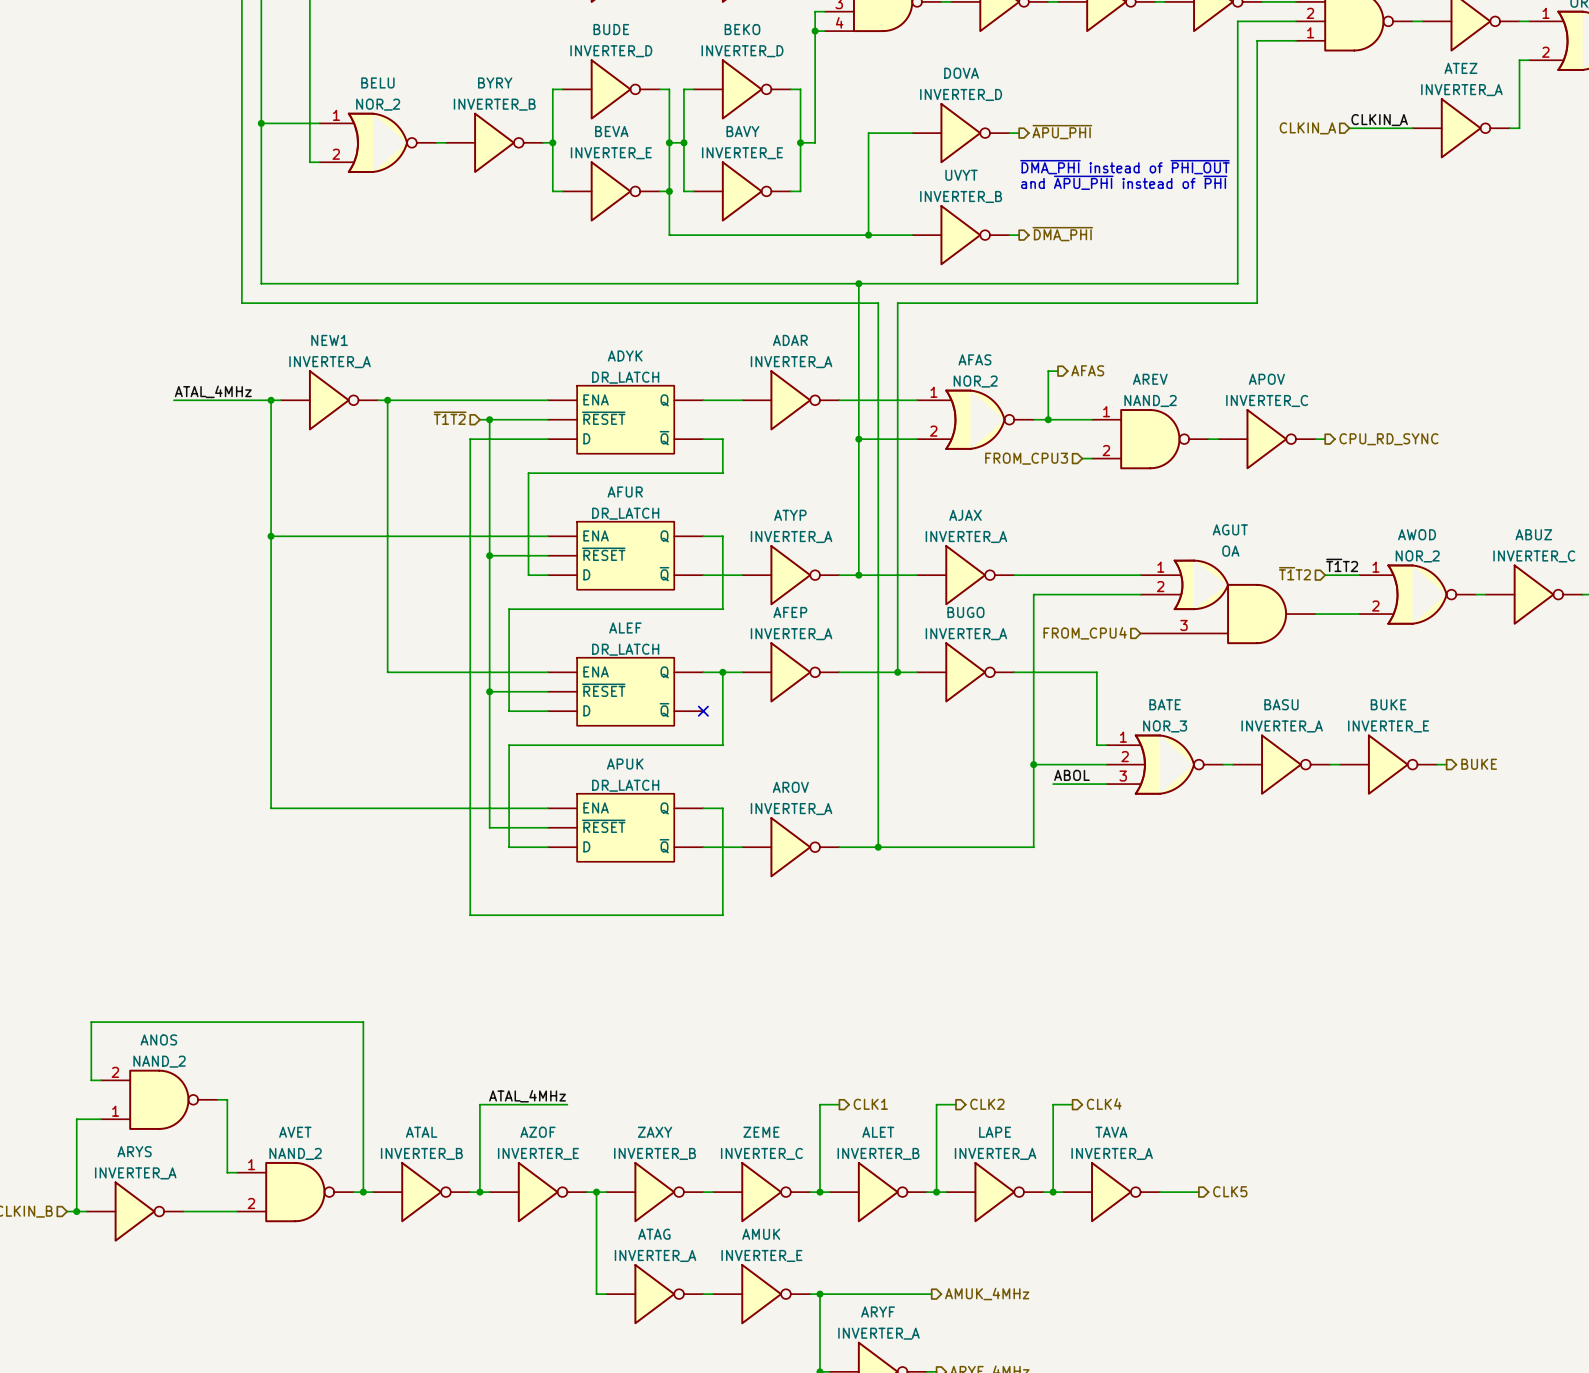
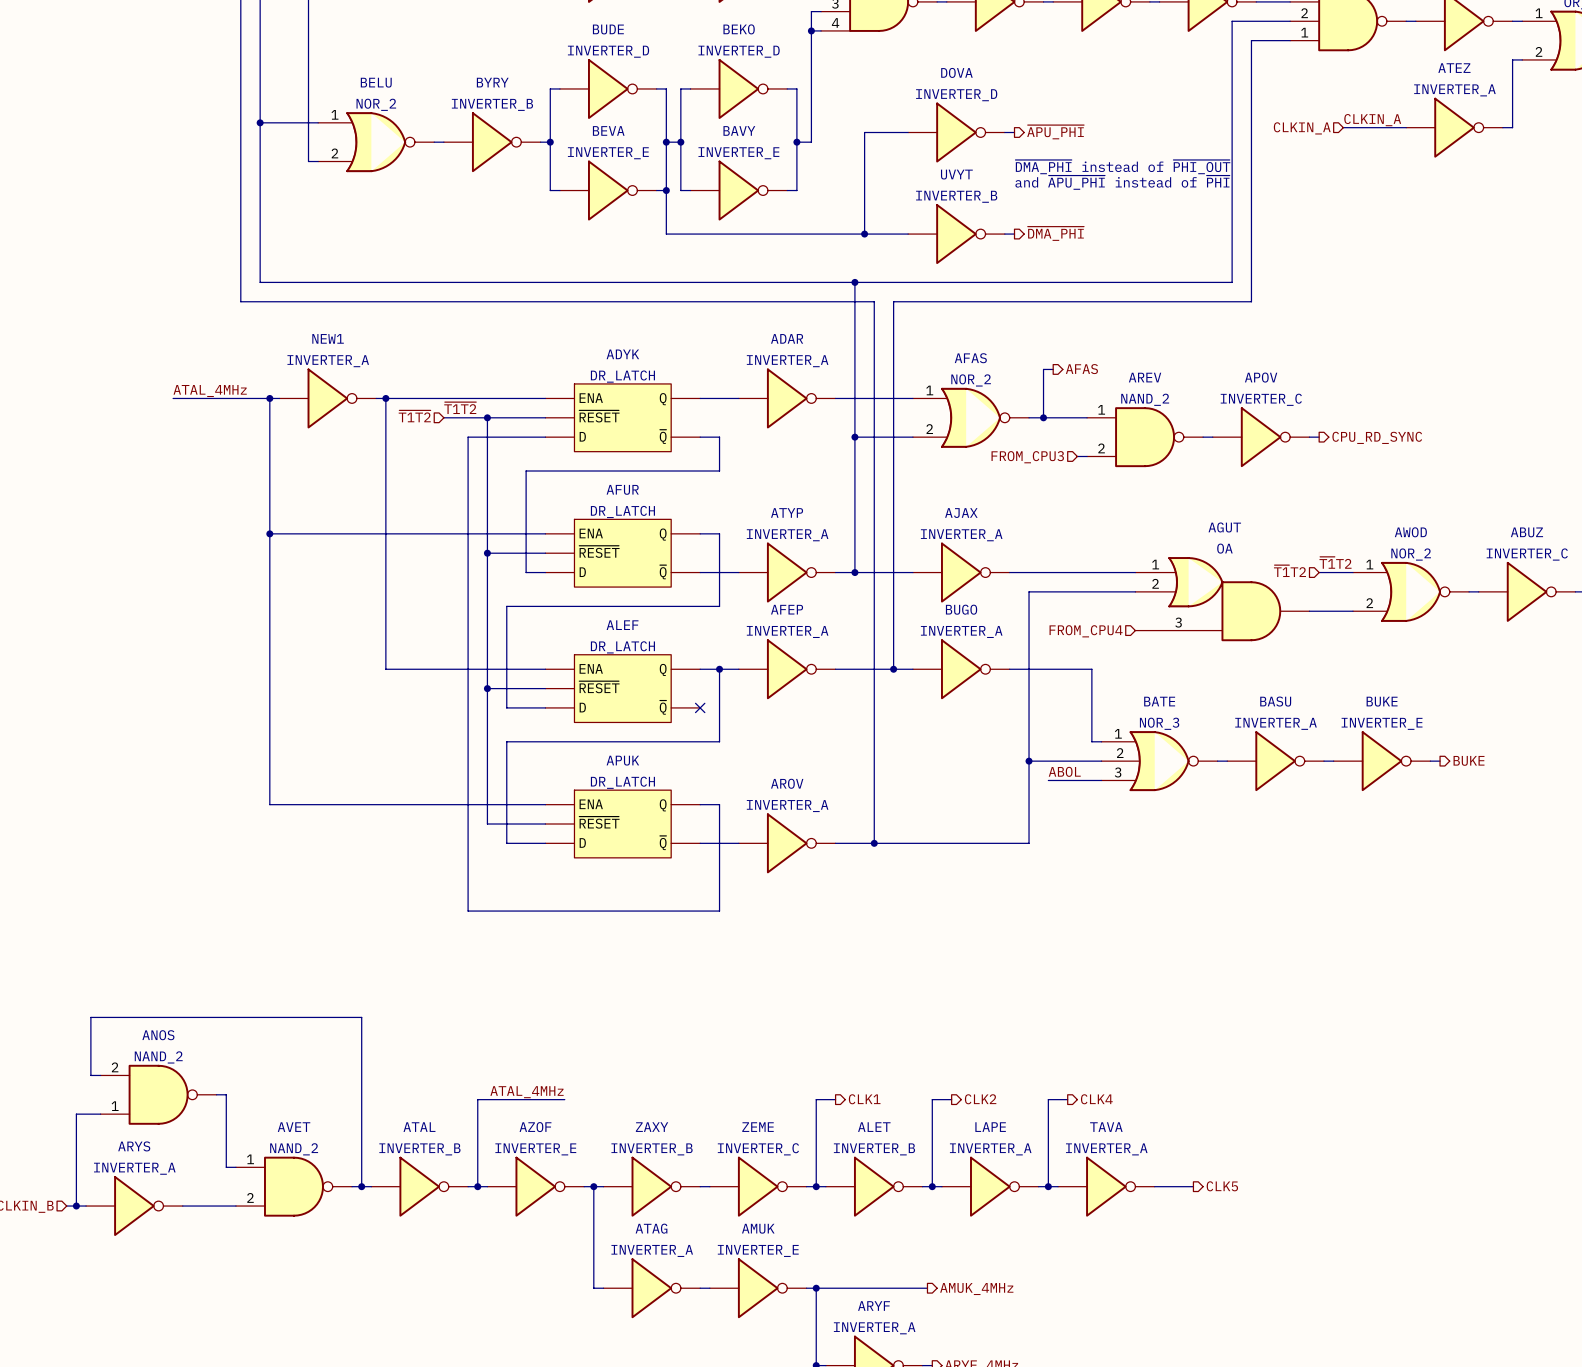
label: none -> ~{T1T2} (460, 408)
hierarchical label position: ~{T1T2} (450, 418) -> ~{T1T2} (414, 416)
wire: none -> (443, 417) (477, 417)

